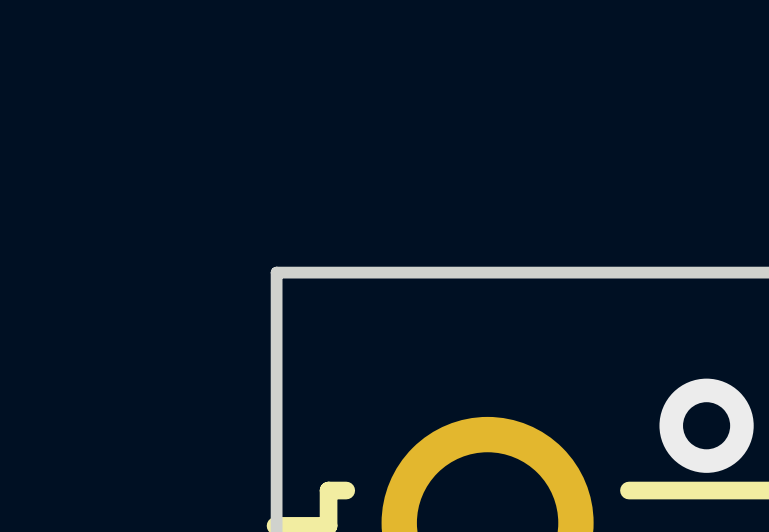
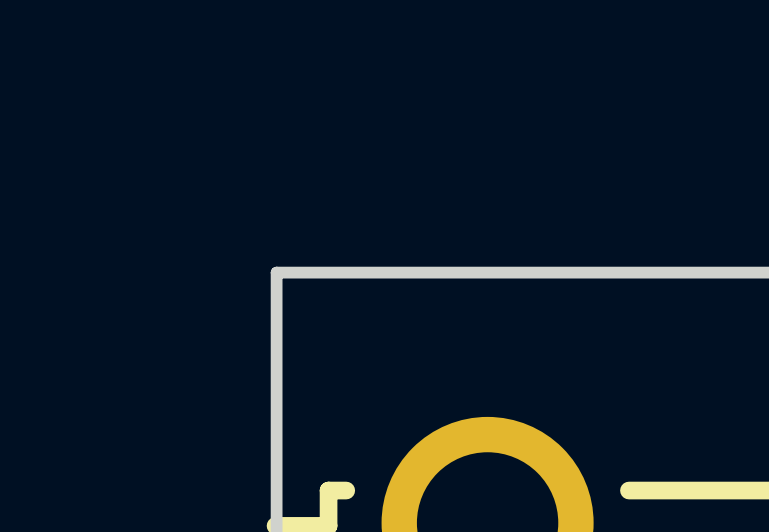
via: (706, 425) -> none

